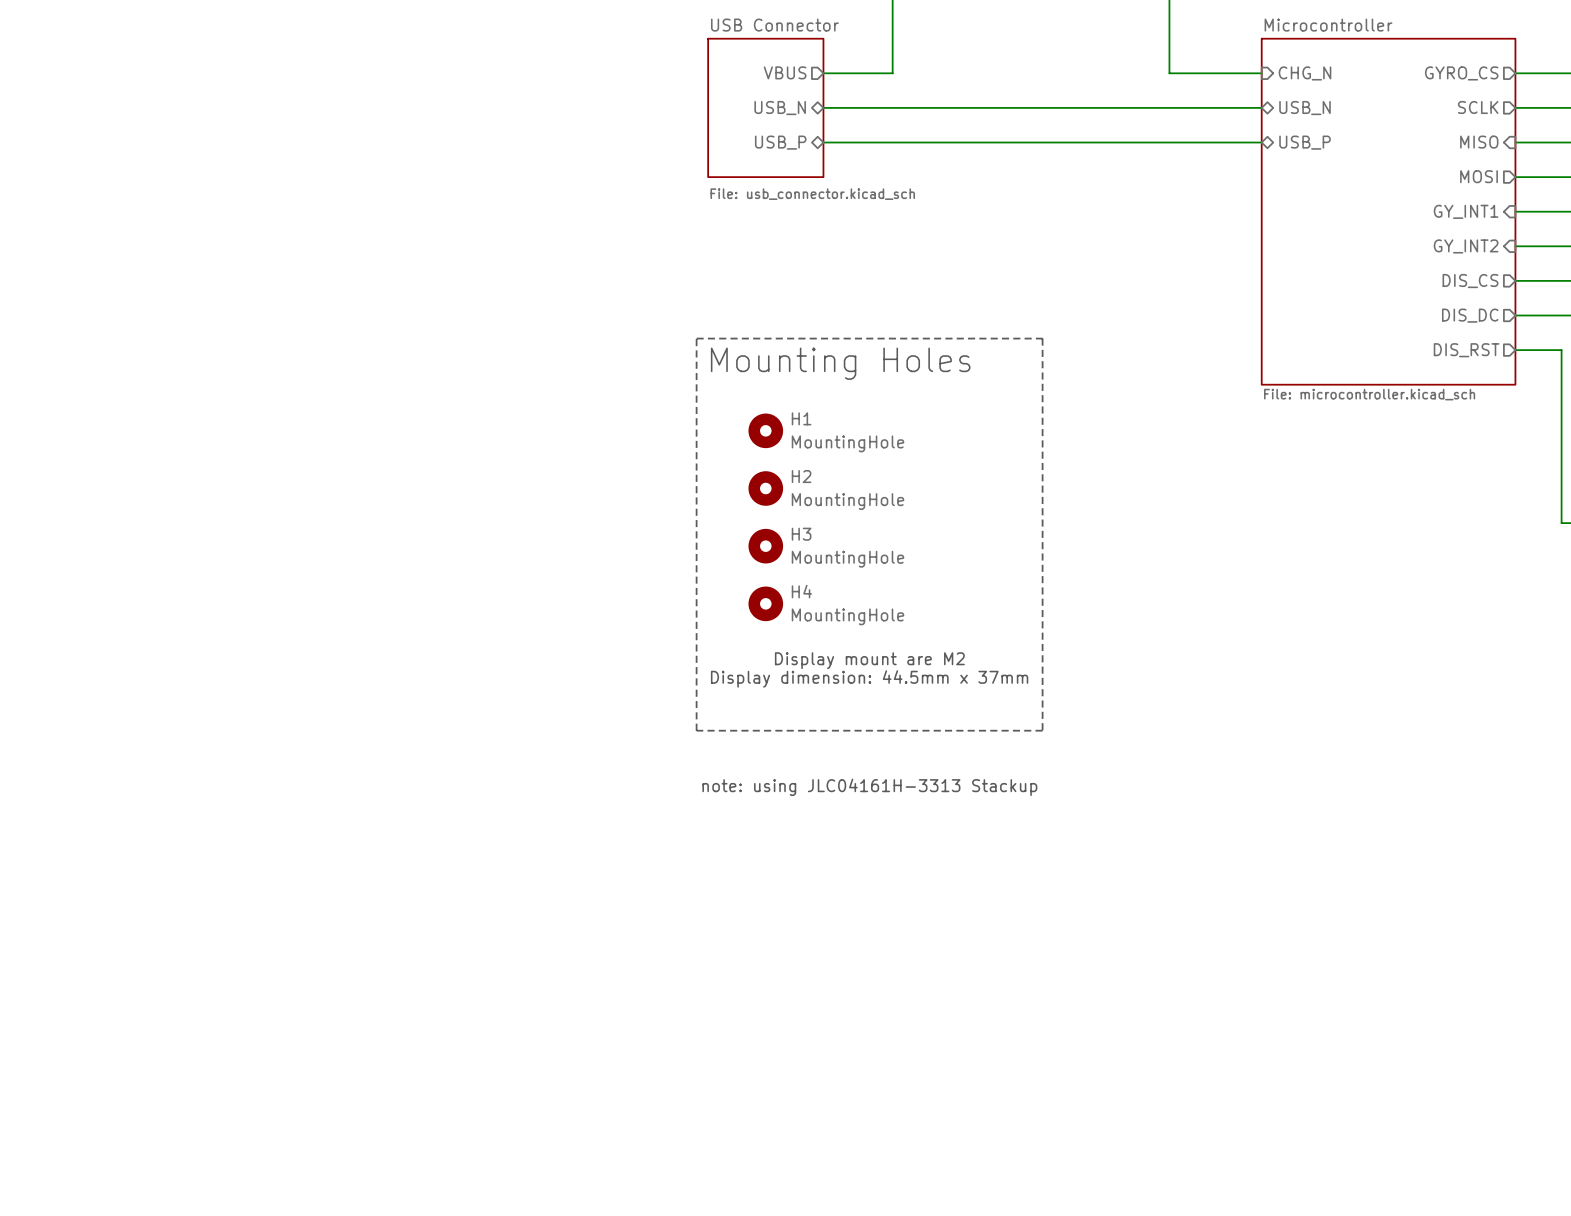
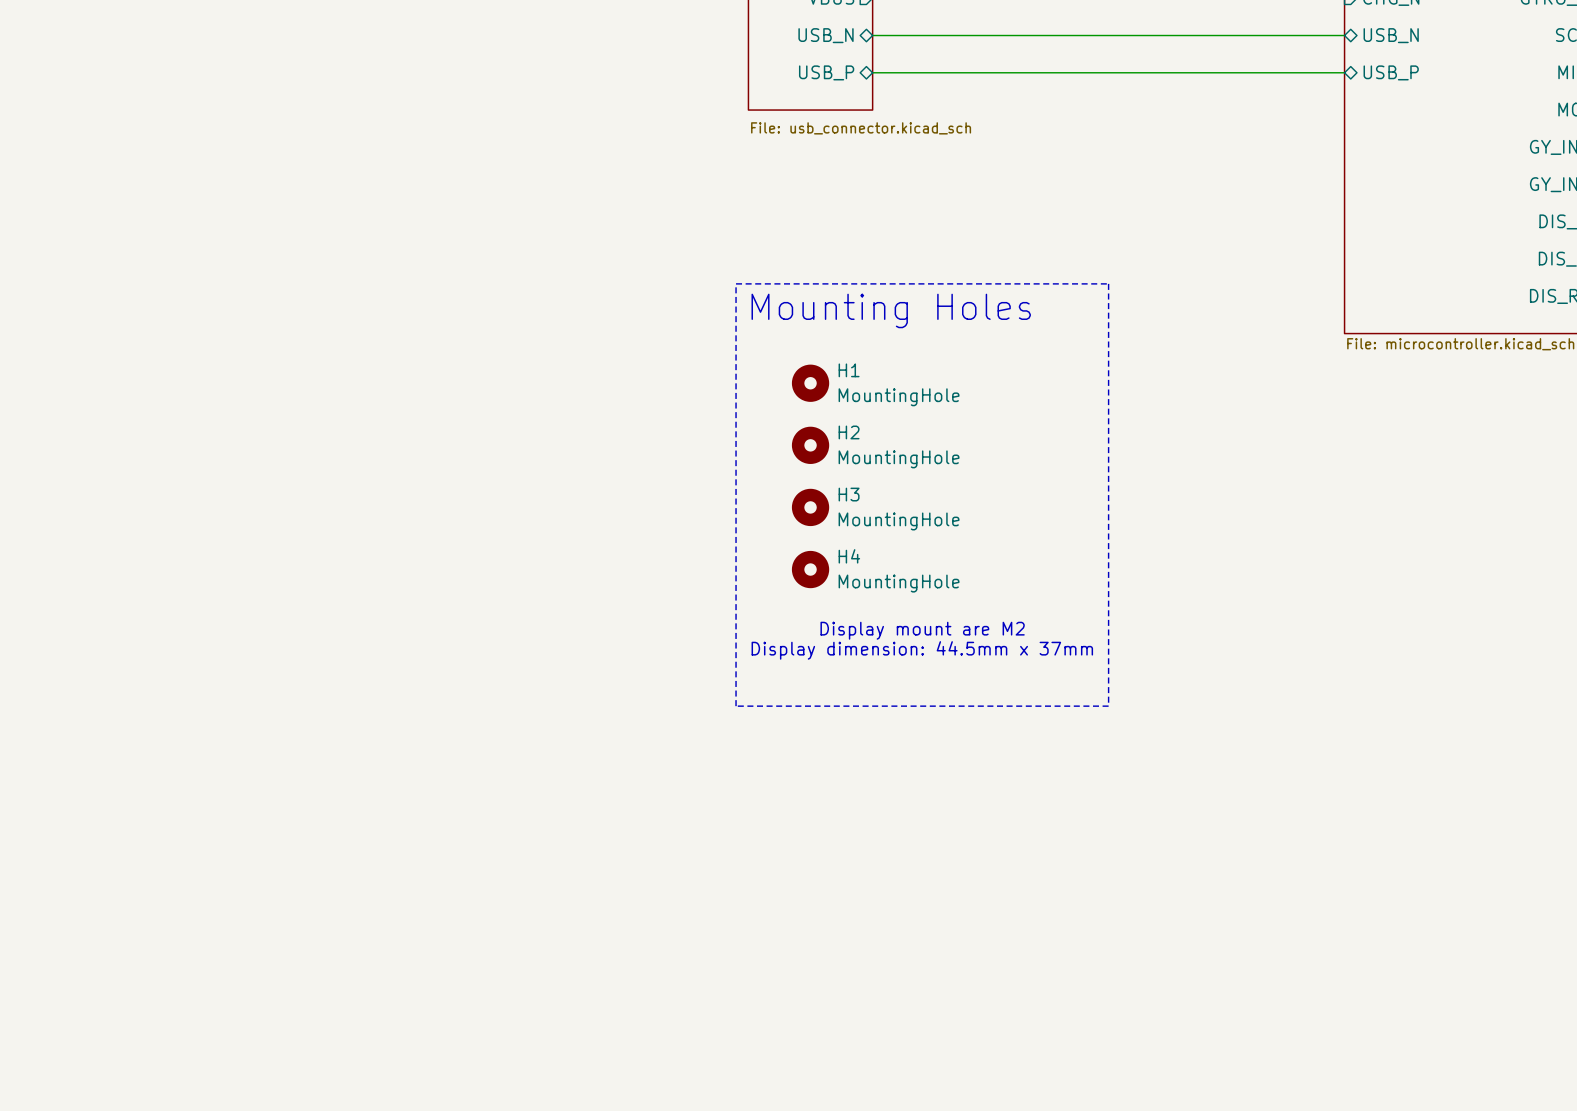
text: note: using JLC04161H-3313 Stackup (869, 787) -> none

